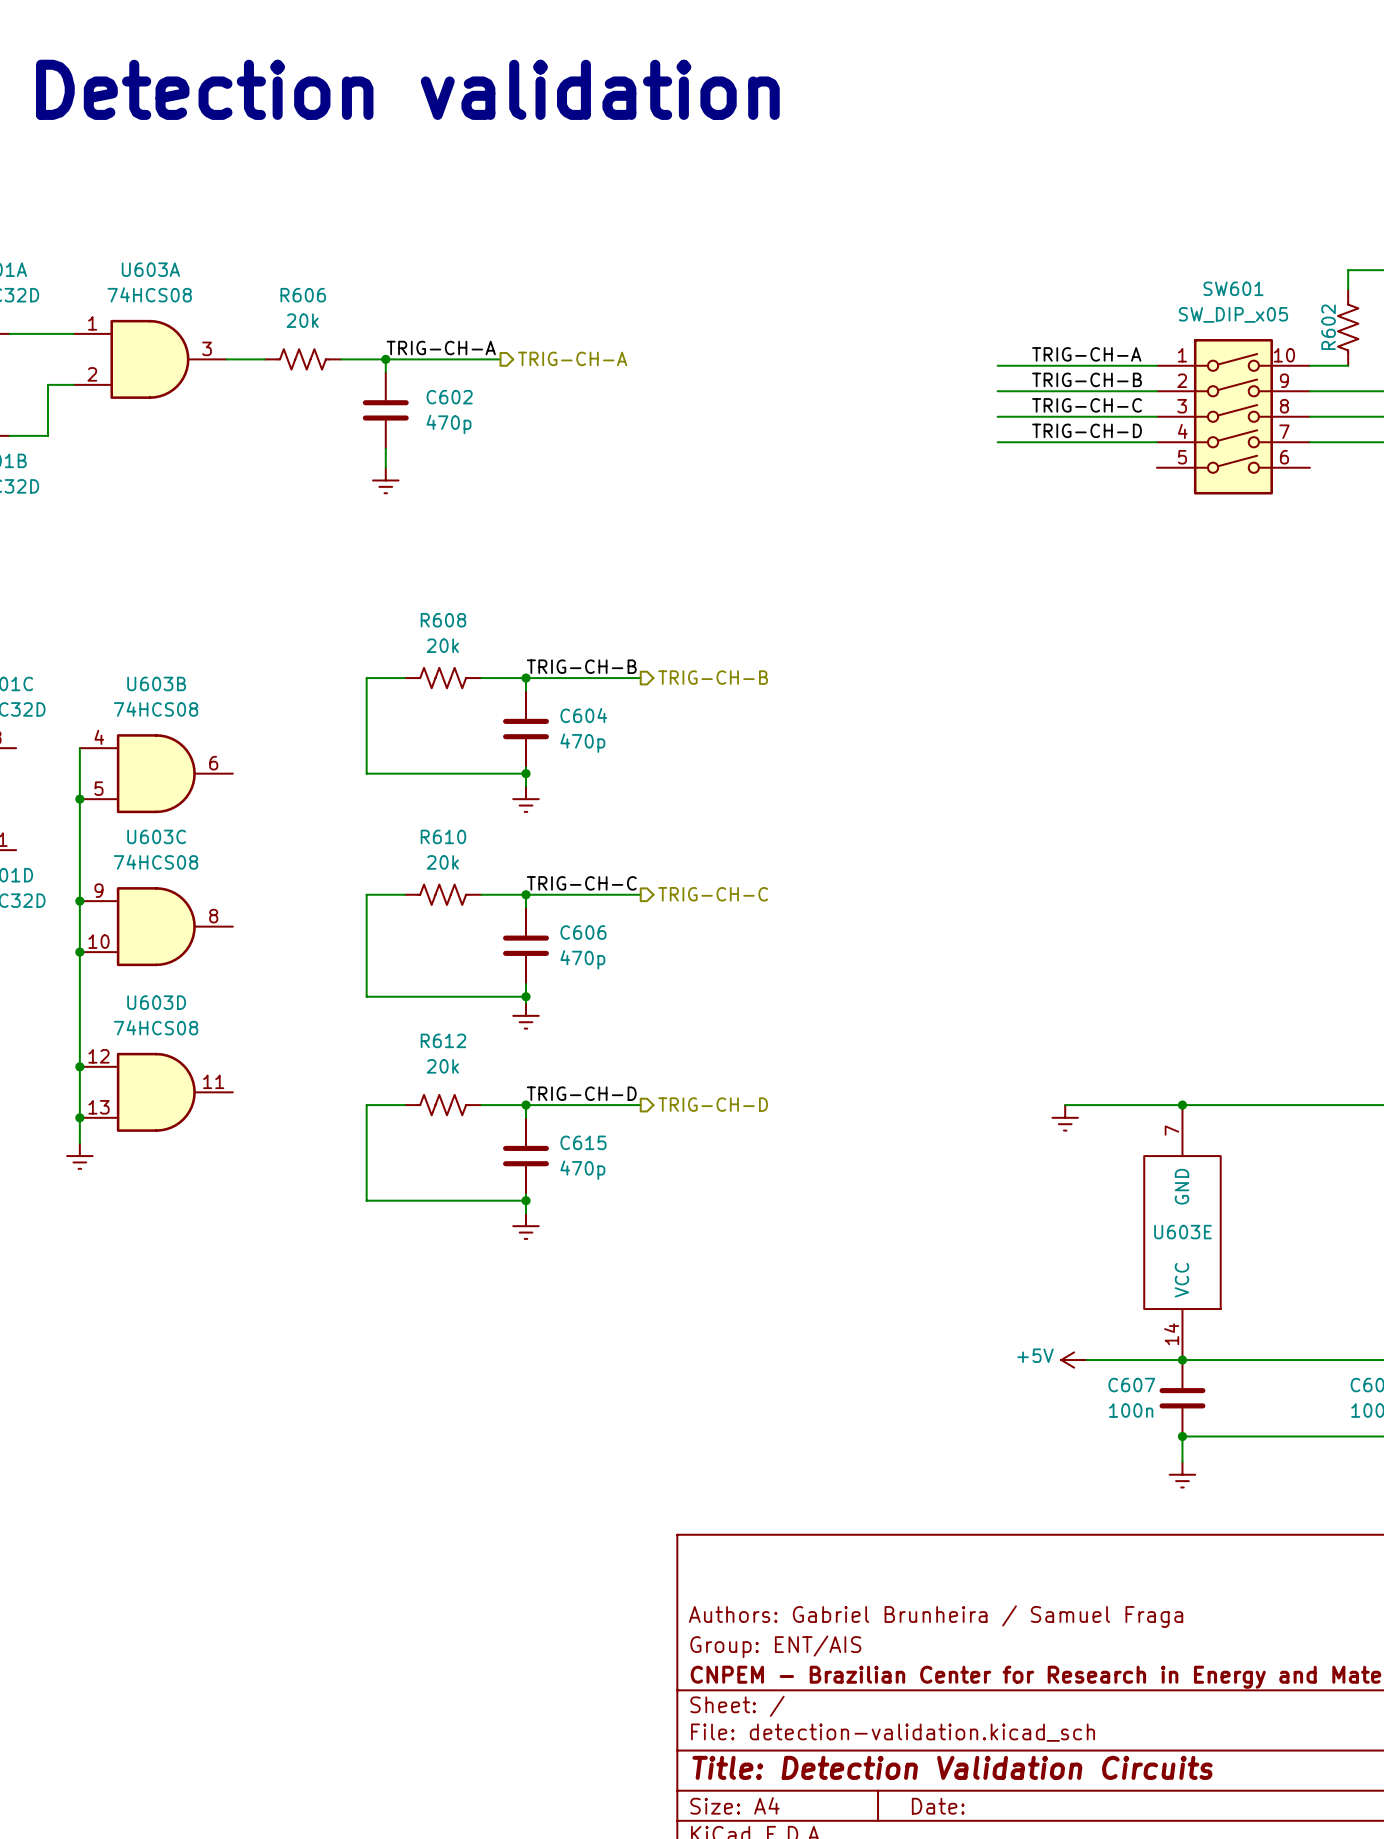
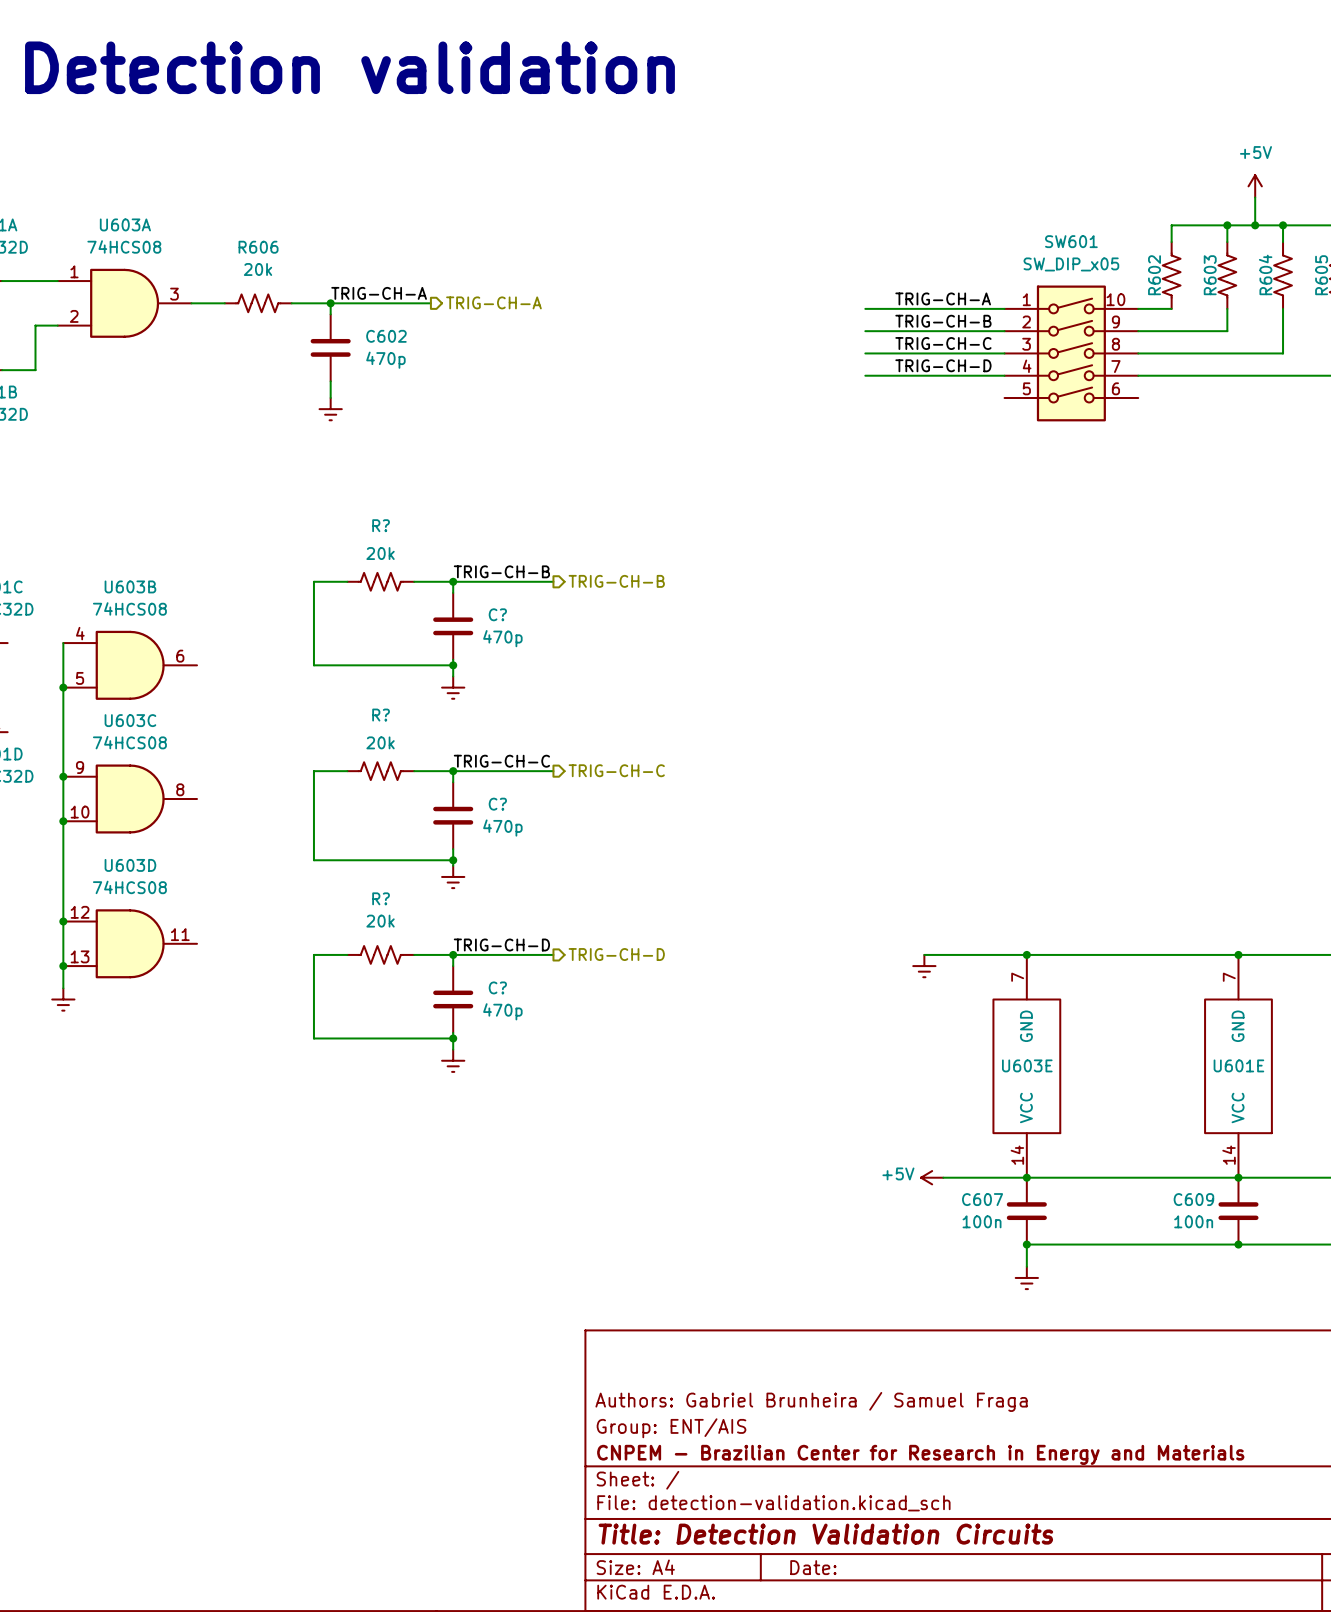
R608 name: R608 (443, 620) -> R? (381, 525)
C604 name: C604 (583, 715) -> C? (497, 614)
R610 name: R610 (443, 836) -> R? (381, 715)
C606 name: C606 (583, 932) -> C? (497, 804)
R612 name: R612 (443, 1040) -> R? (381, 898)
C615 name: C615 (583, 1142) -> C? (497, 987)

